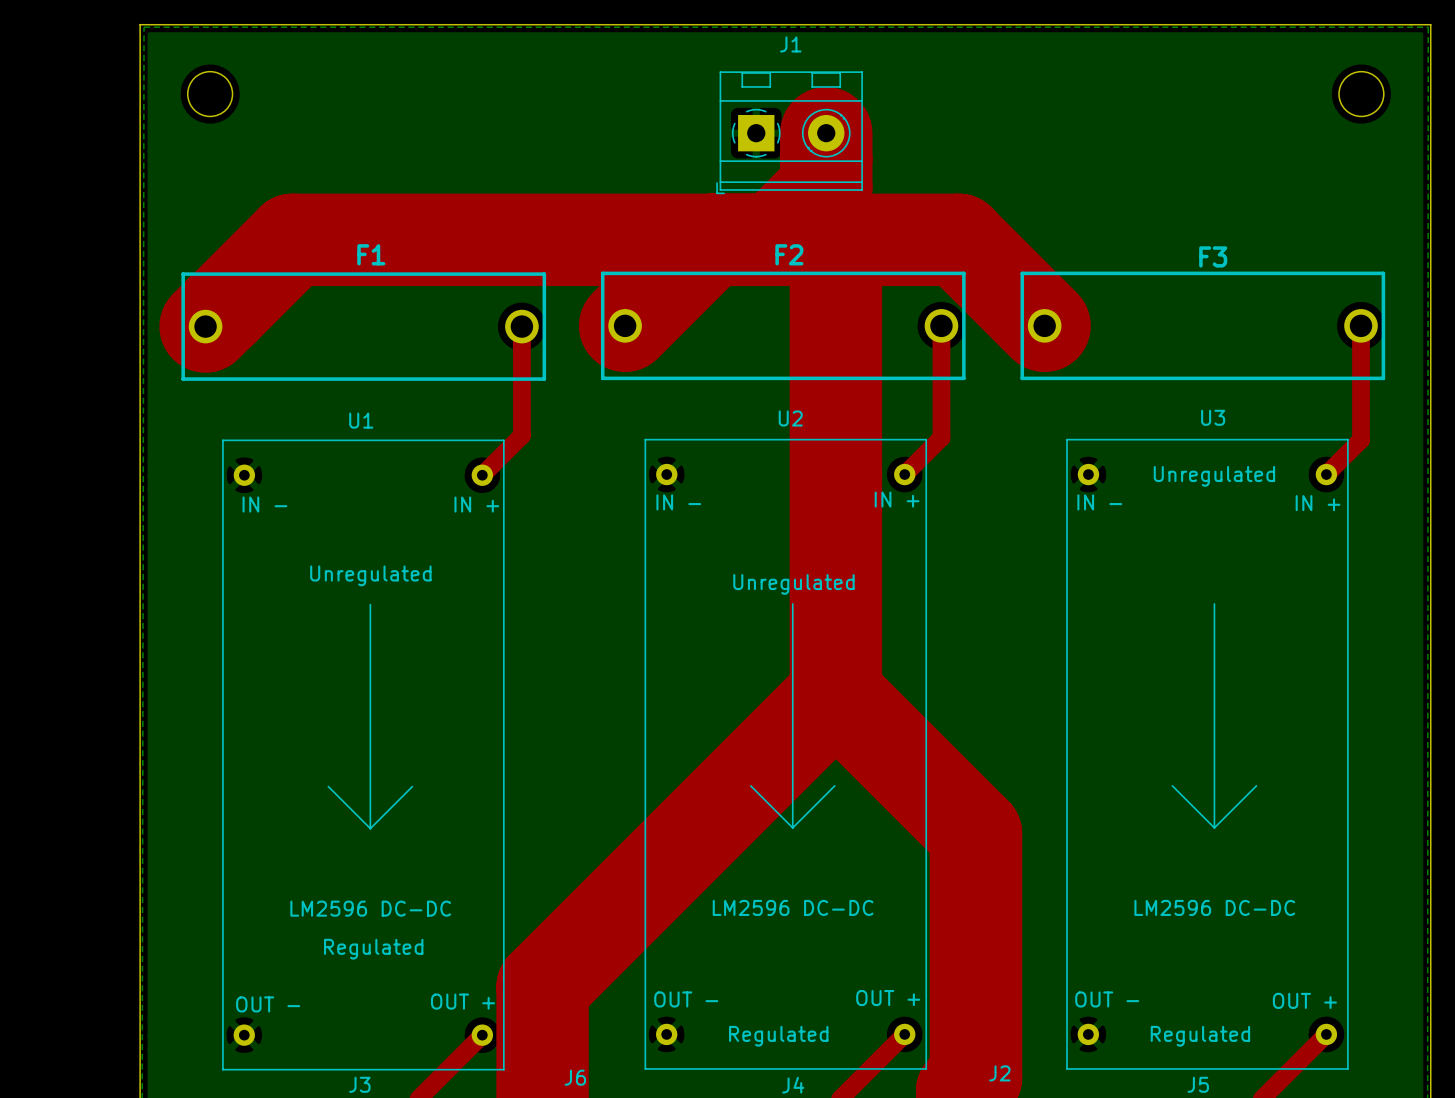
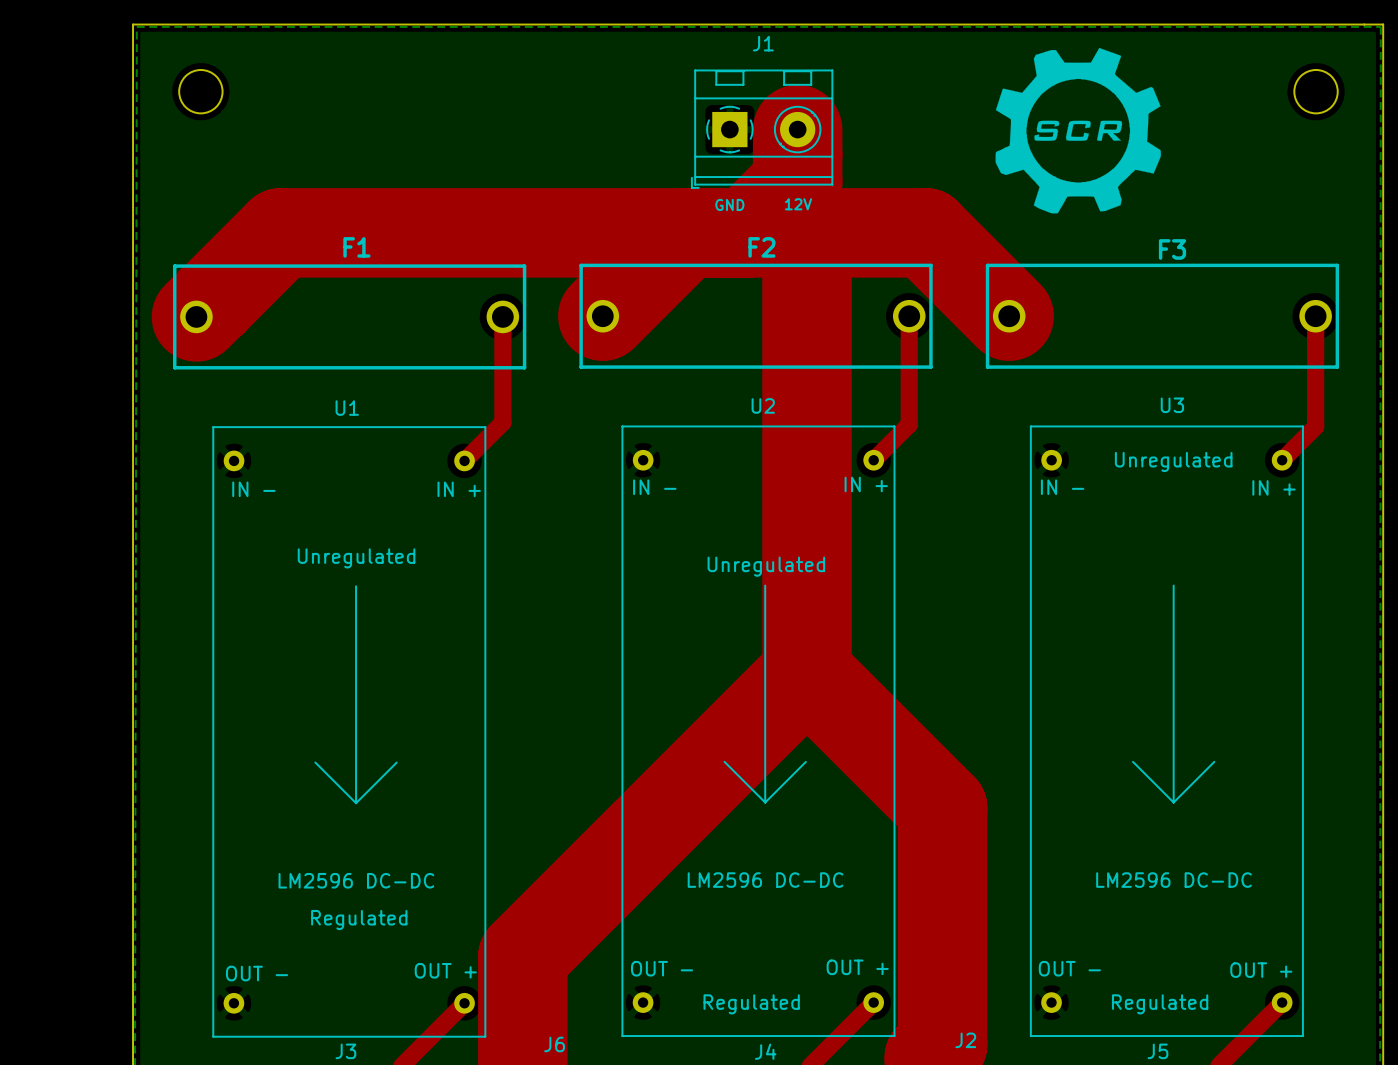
drawing: none -> [995, 47, 1161, 214]
text: none -> GND (729, 204)
text: none -> 12V (798, 204)

